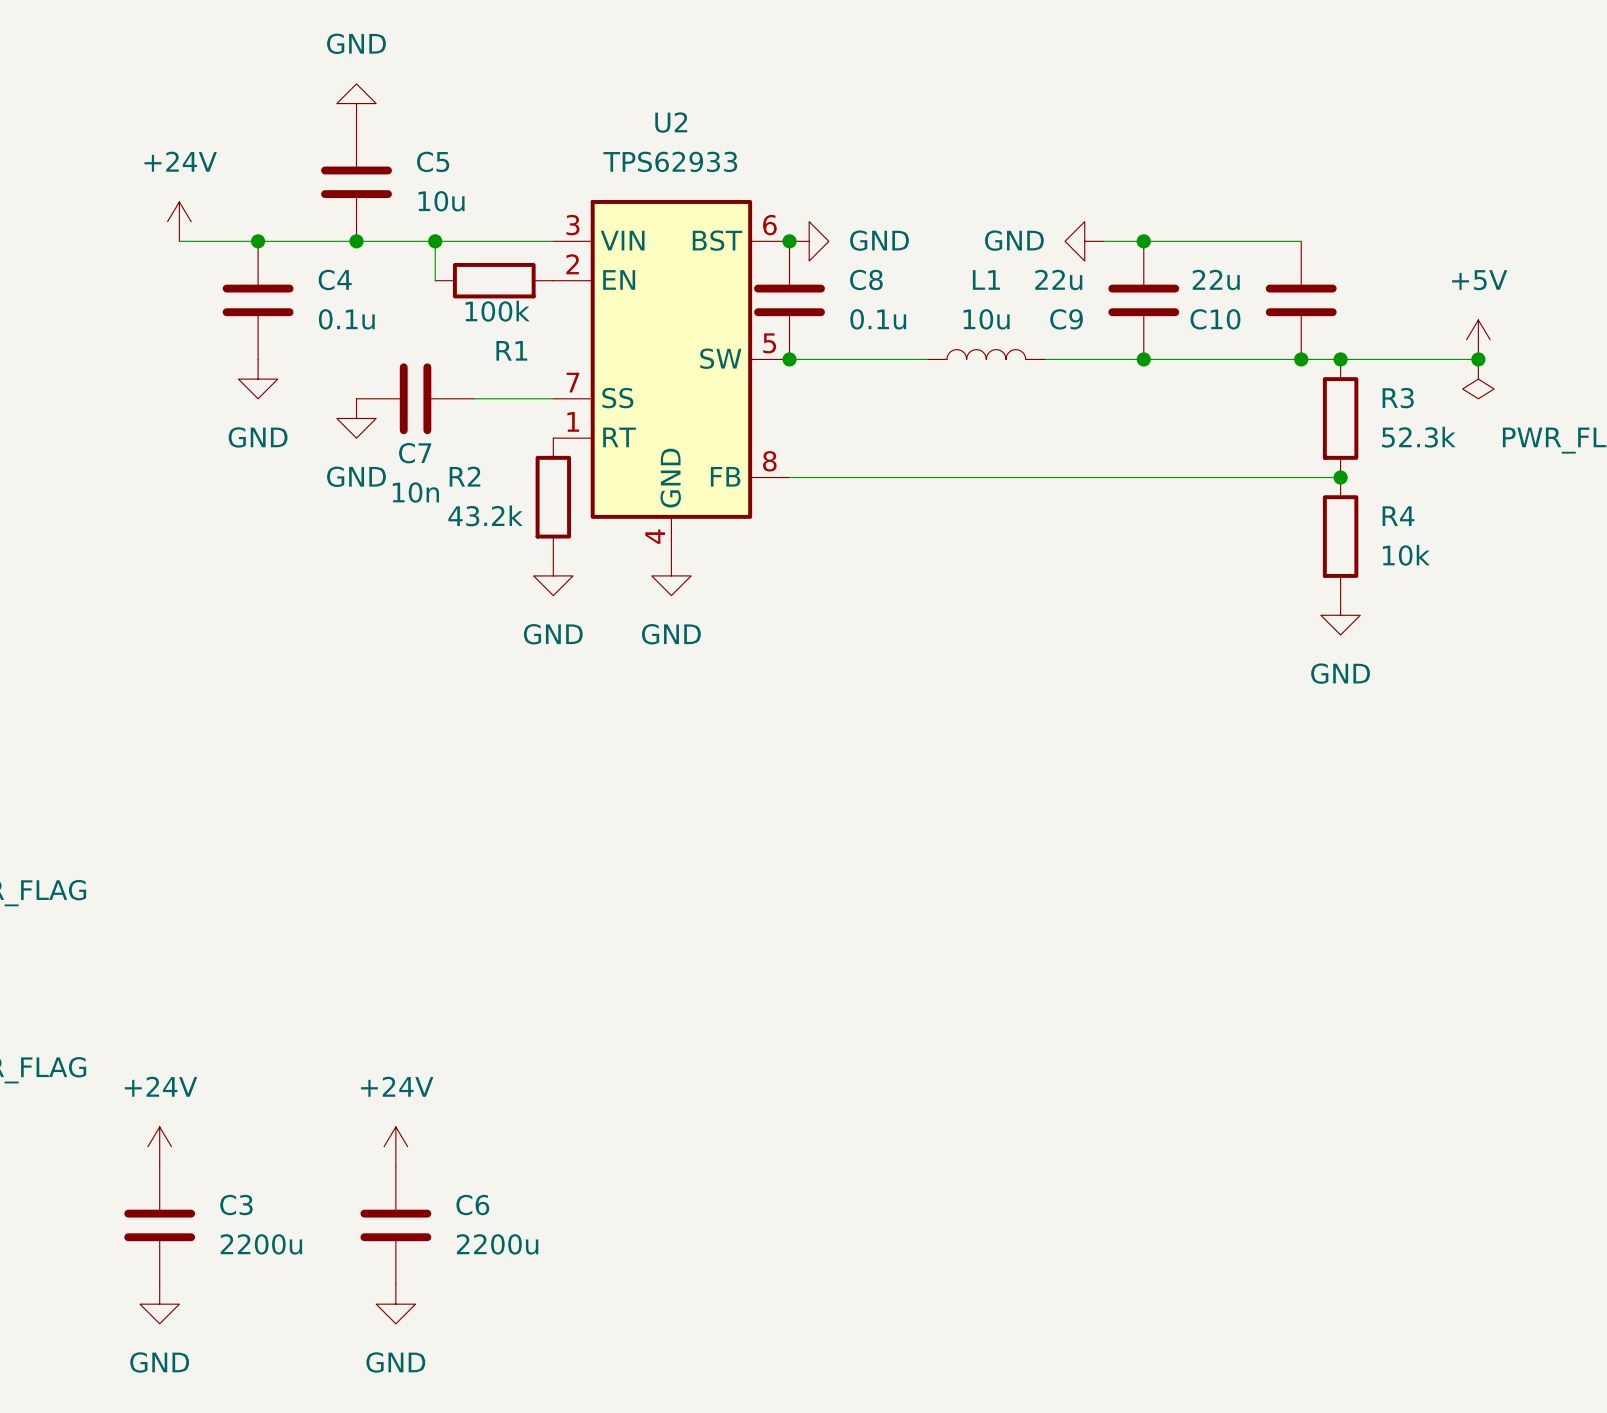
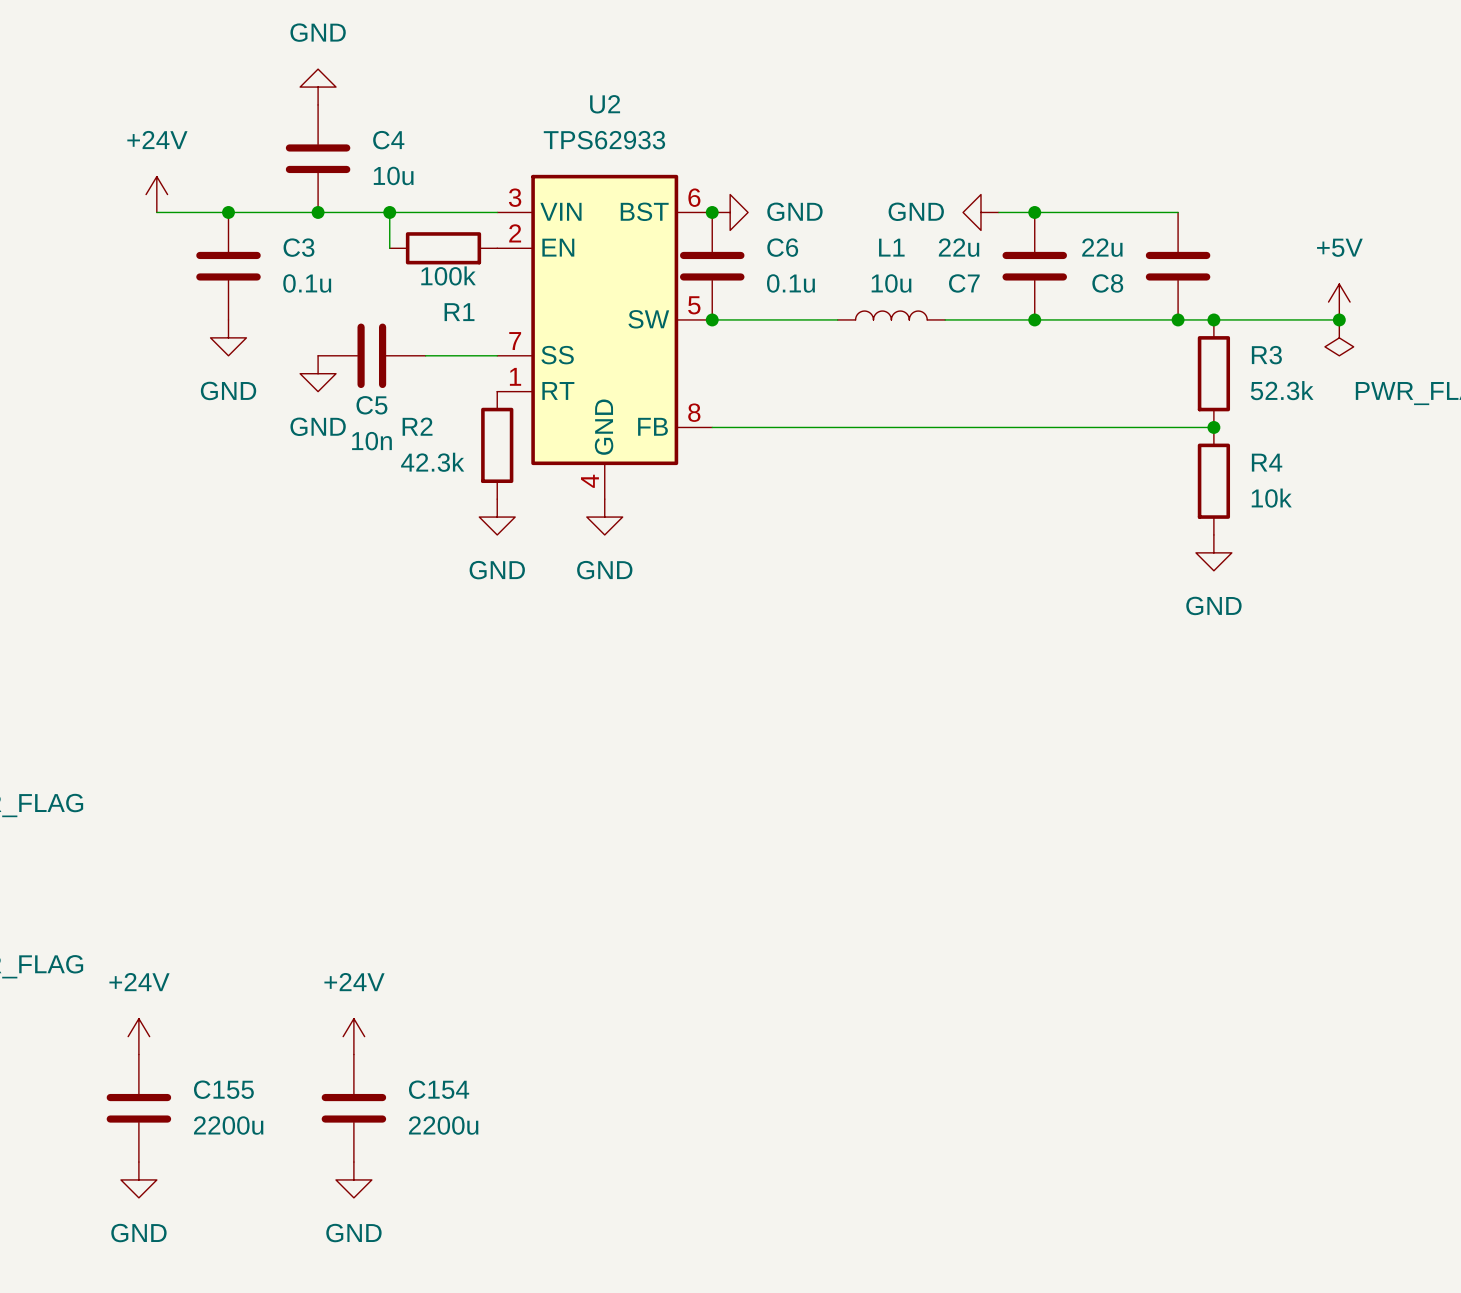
C5 name: C5 (433, 161) -> C4 (388, 140)
C4 name: C4 (335, 279) -> C3 (298, 247)
C8 name: C8 (866, 279) -> C6 (782, 247)
C9 name: C9 (1066, 319) -> C7 (964, 283)
C10 name: C10 (1215, 319) -> C8 (1107, 283)
C7 name: C7 (415, 453) -> C5 (371, 405)
R2 value: 43.2k (485, 515) -> 42.3k (432, 462)
C3 name: C3 (236, 1205) -> C155 (223, 1089)
C6 name: C6 (472, 1205) -> C154 (439, 1089)

